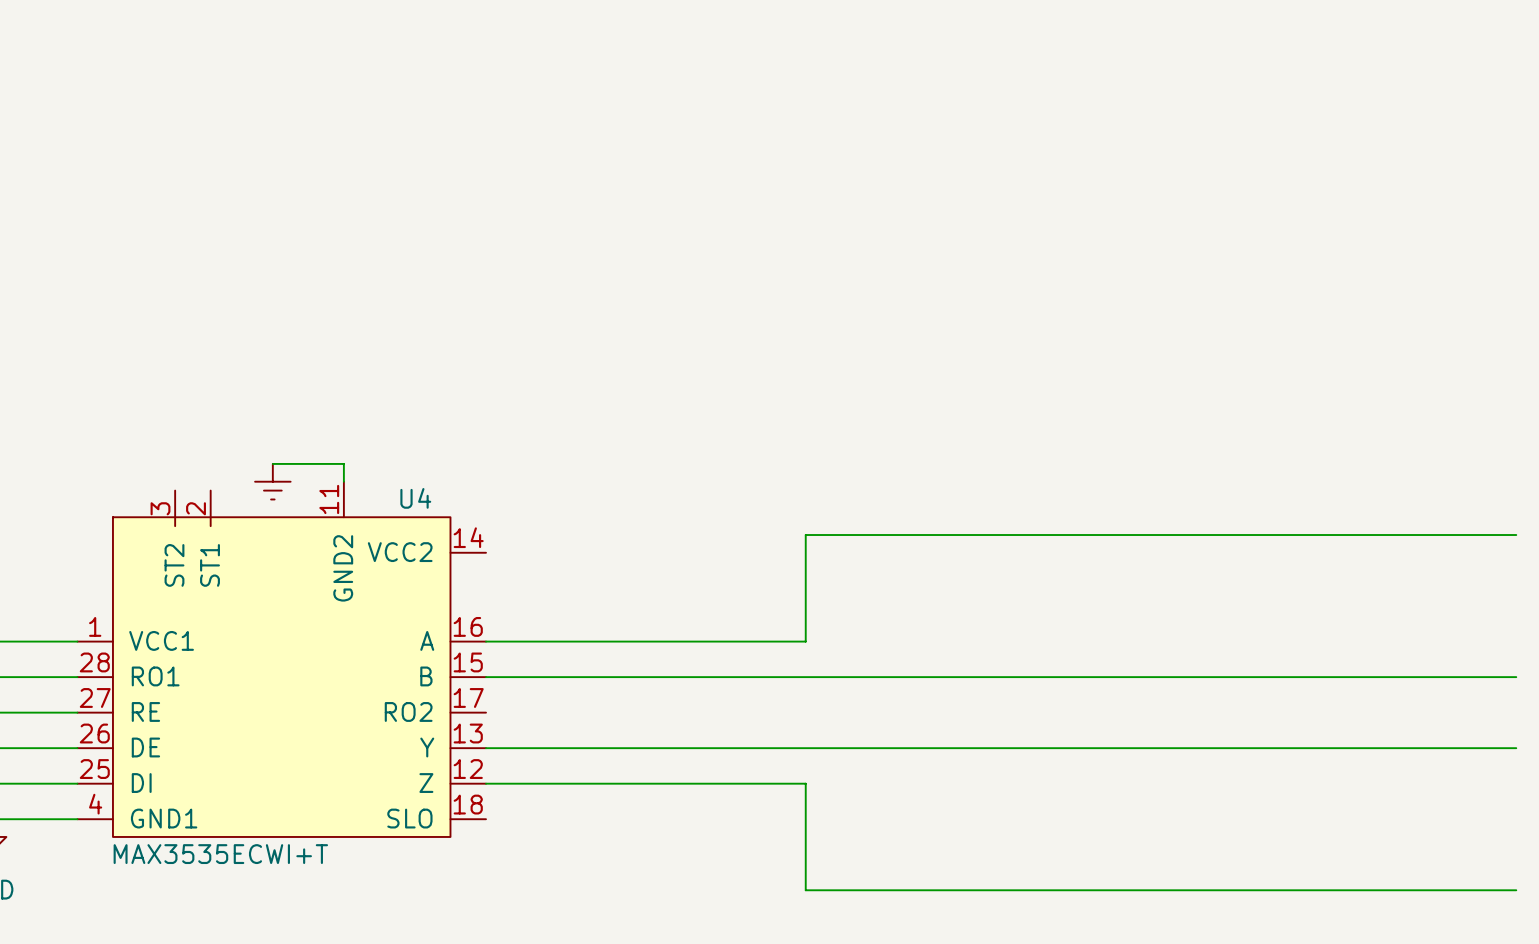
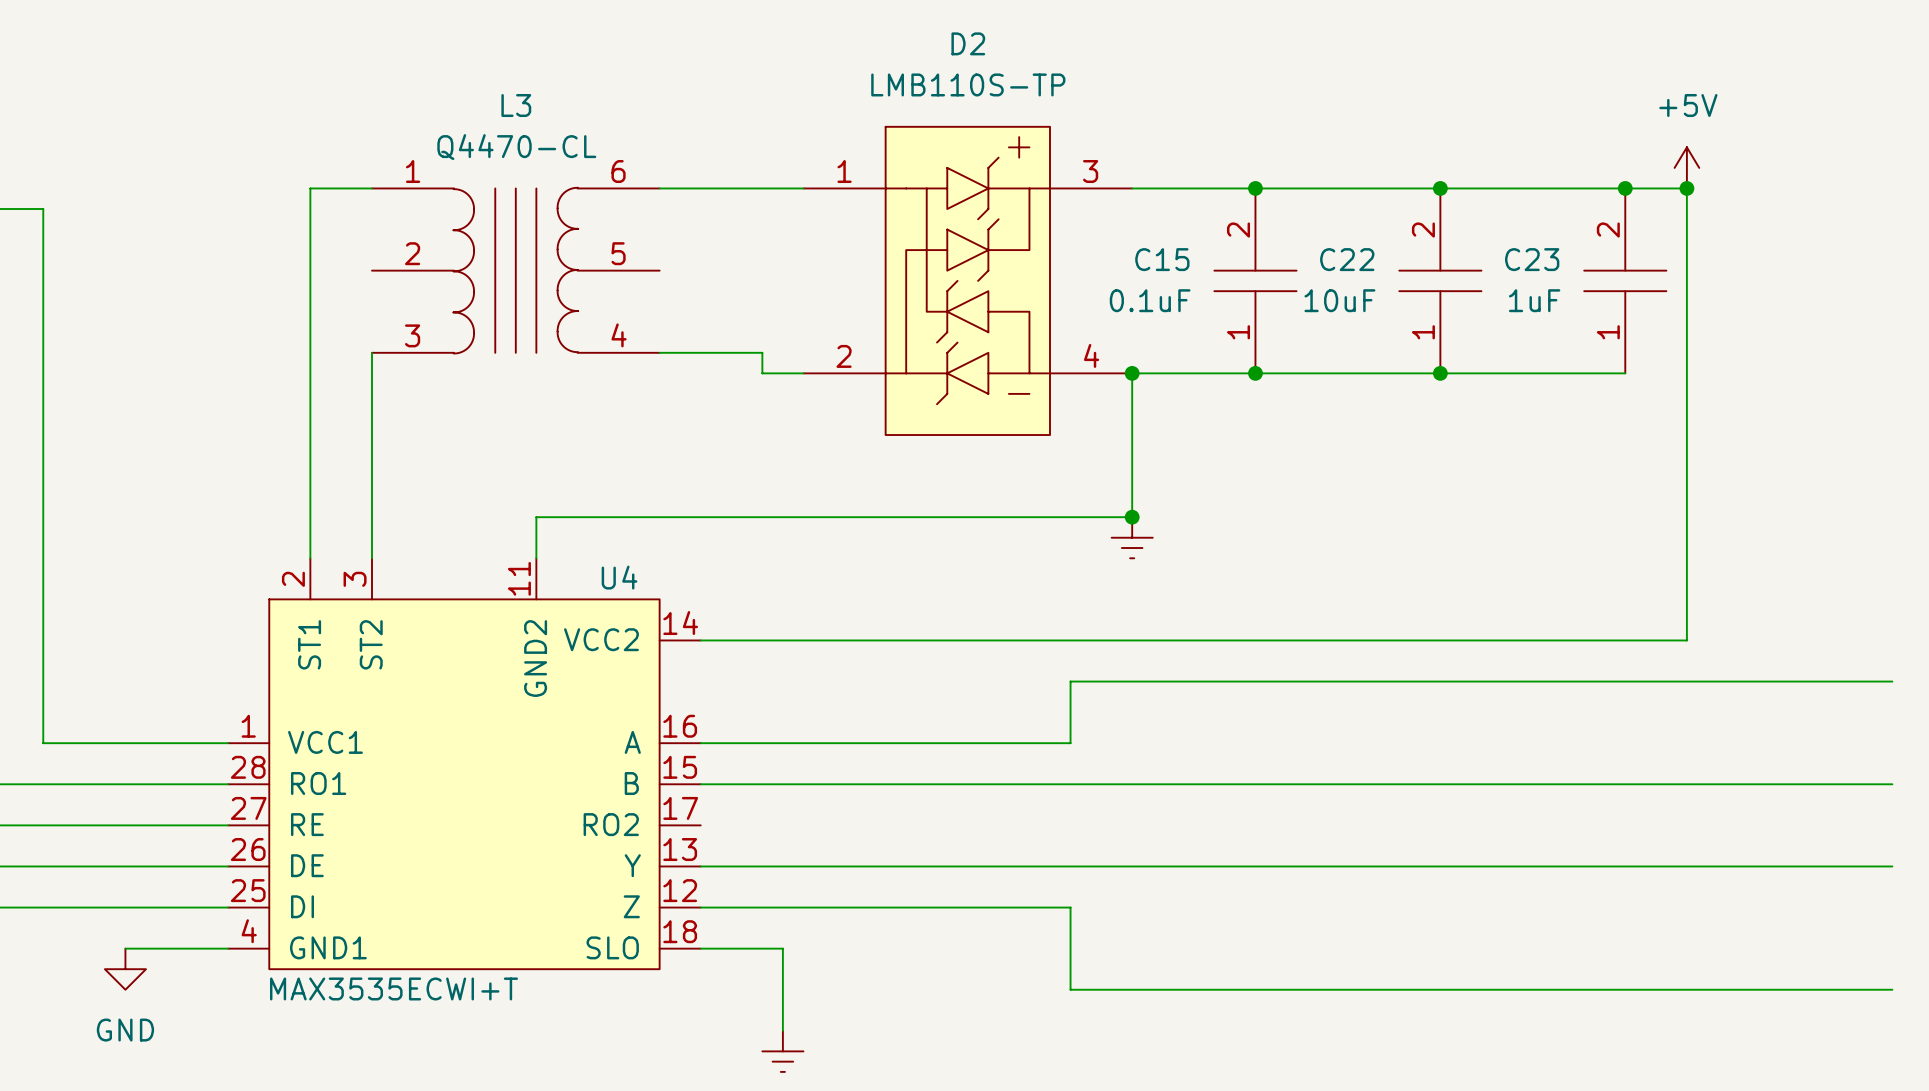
power symbol: none -> +5V (1686, 167)
wire: none -> (371, 188) (310, 188) (310, 558)
wire: none -> (659, 188) (803, 188)
wire: none -> (1132, 188) (1686, 188) (1686, 640) (700, 640)
junction: none -> (1255, 188)
junction: none -> (1440, 188)
junction: none -> (1625, 188)
junction: none -> (1686, 188)
L3: none -> (515, 270)
D2: none -> (967, 280)
C15: none -> (1255, 280)
C22: none -> (1440, 280)
C23: none -> (1625, 280)
wire: none -> (371, 352) (371, 558)
wire: none -> (659, 352) (762, 352) (762, 373) (803, 373)
junction: none -> (1132, 373)
junction: none -> (1255, 373)
junction: none -> (1440, 373)
junction: none -> (1132, 517)
wire: (272, 463) (343, 463) -> (1625, 373) (1132, 373) (1132, 517) (536, 517) (536, 537)
power symbol: none -> (1132, 537)
U4 symbol: [77, 481, 487, 837] -> [228, 558, 701, 970]
power symbol: (272, 481) -> none
wire: (1516, 535) (805, 535) (805, 588) -> (1892, 681) (1070, 681)
wire: none -> (700, 948) (782, 948) (782, 1030)
wire: (805, 854) (805, 890) (1516, 890) -> (1070, 989) (1892, 989)
power symbol: none -> (782, 1051)

